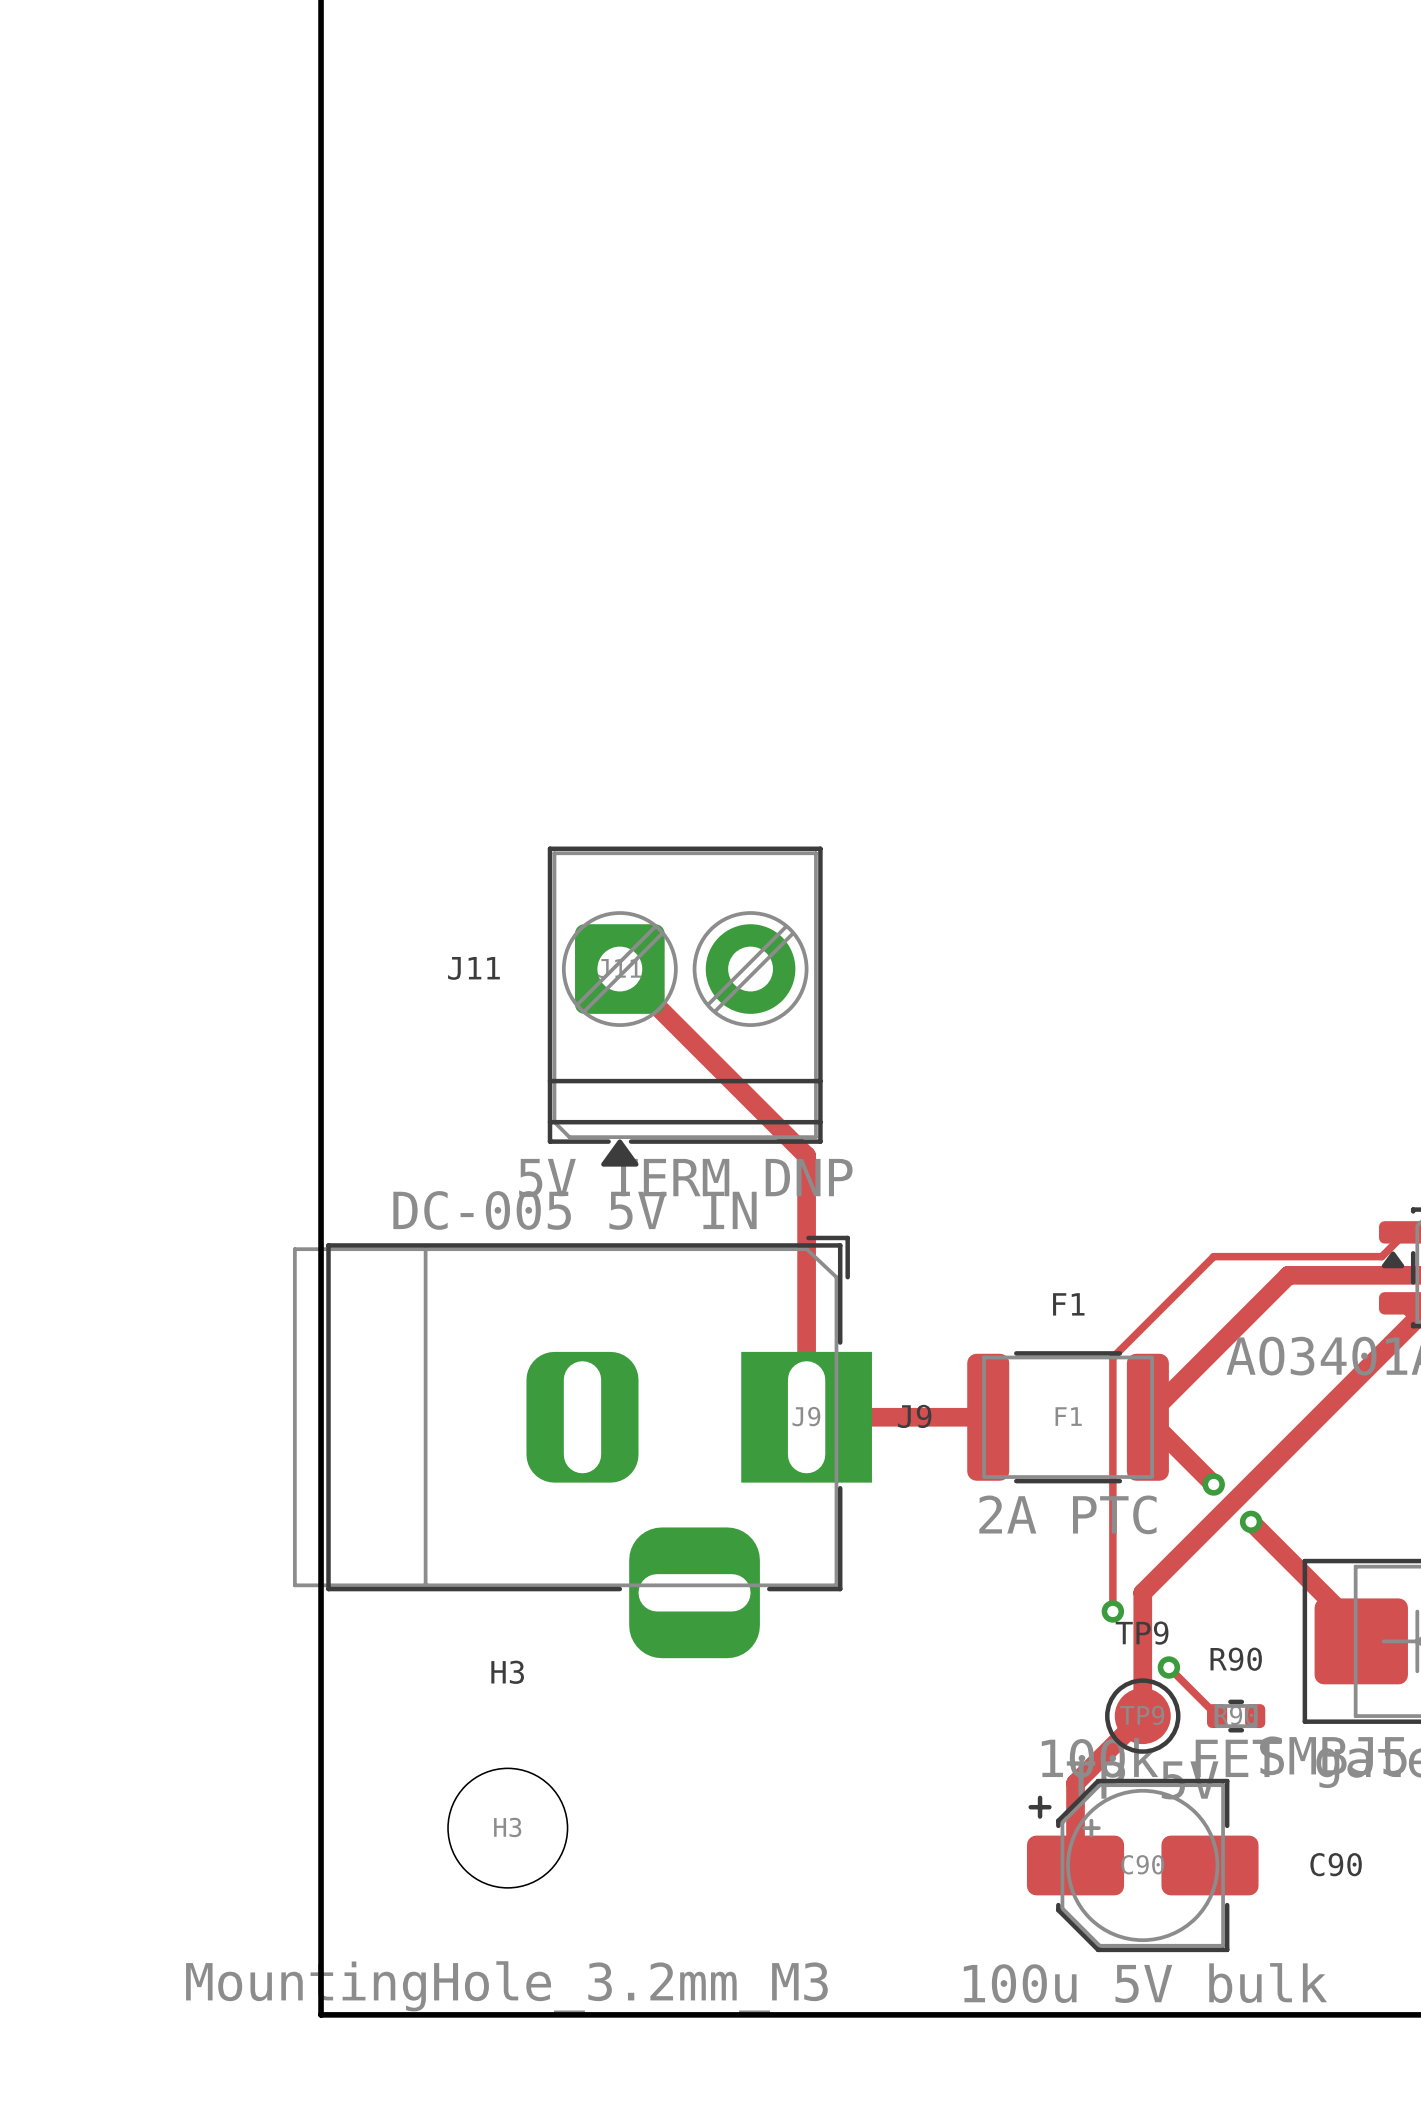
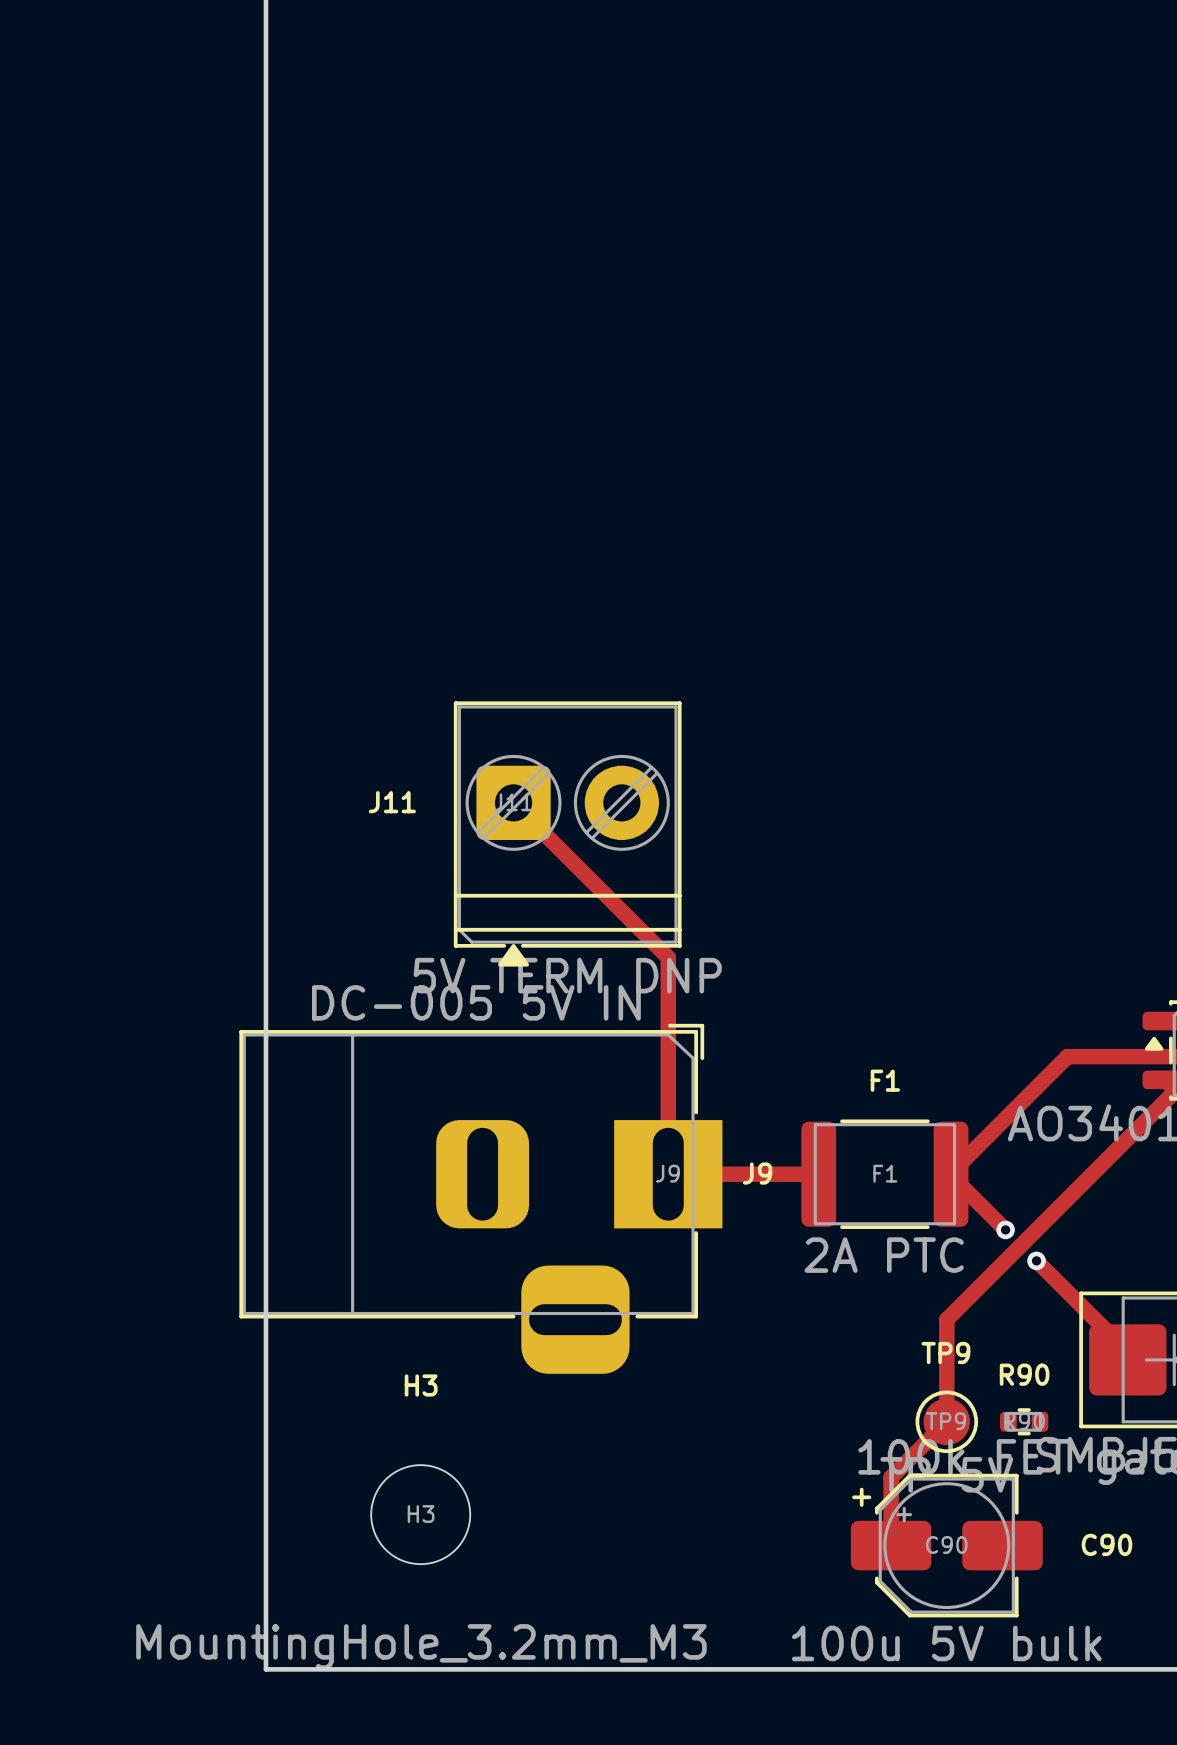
top track: (1406, 1232) (1407, 1230) (1381, 1256) (1213, 1256) (1112, 1357) (1112, 1611) -> none
J9 footprint: [293, 1235, 872, 1659] -> [239, 1023, 723, 1374]
via: (1112, 1611) -> none
top track: (1168, 1667) (1217, 1716) -> none
via: (1168, 1667) -> none

